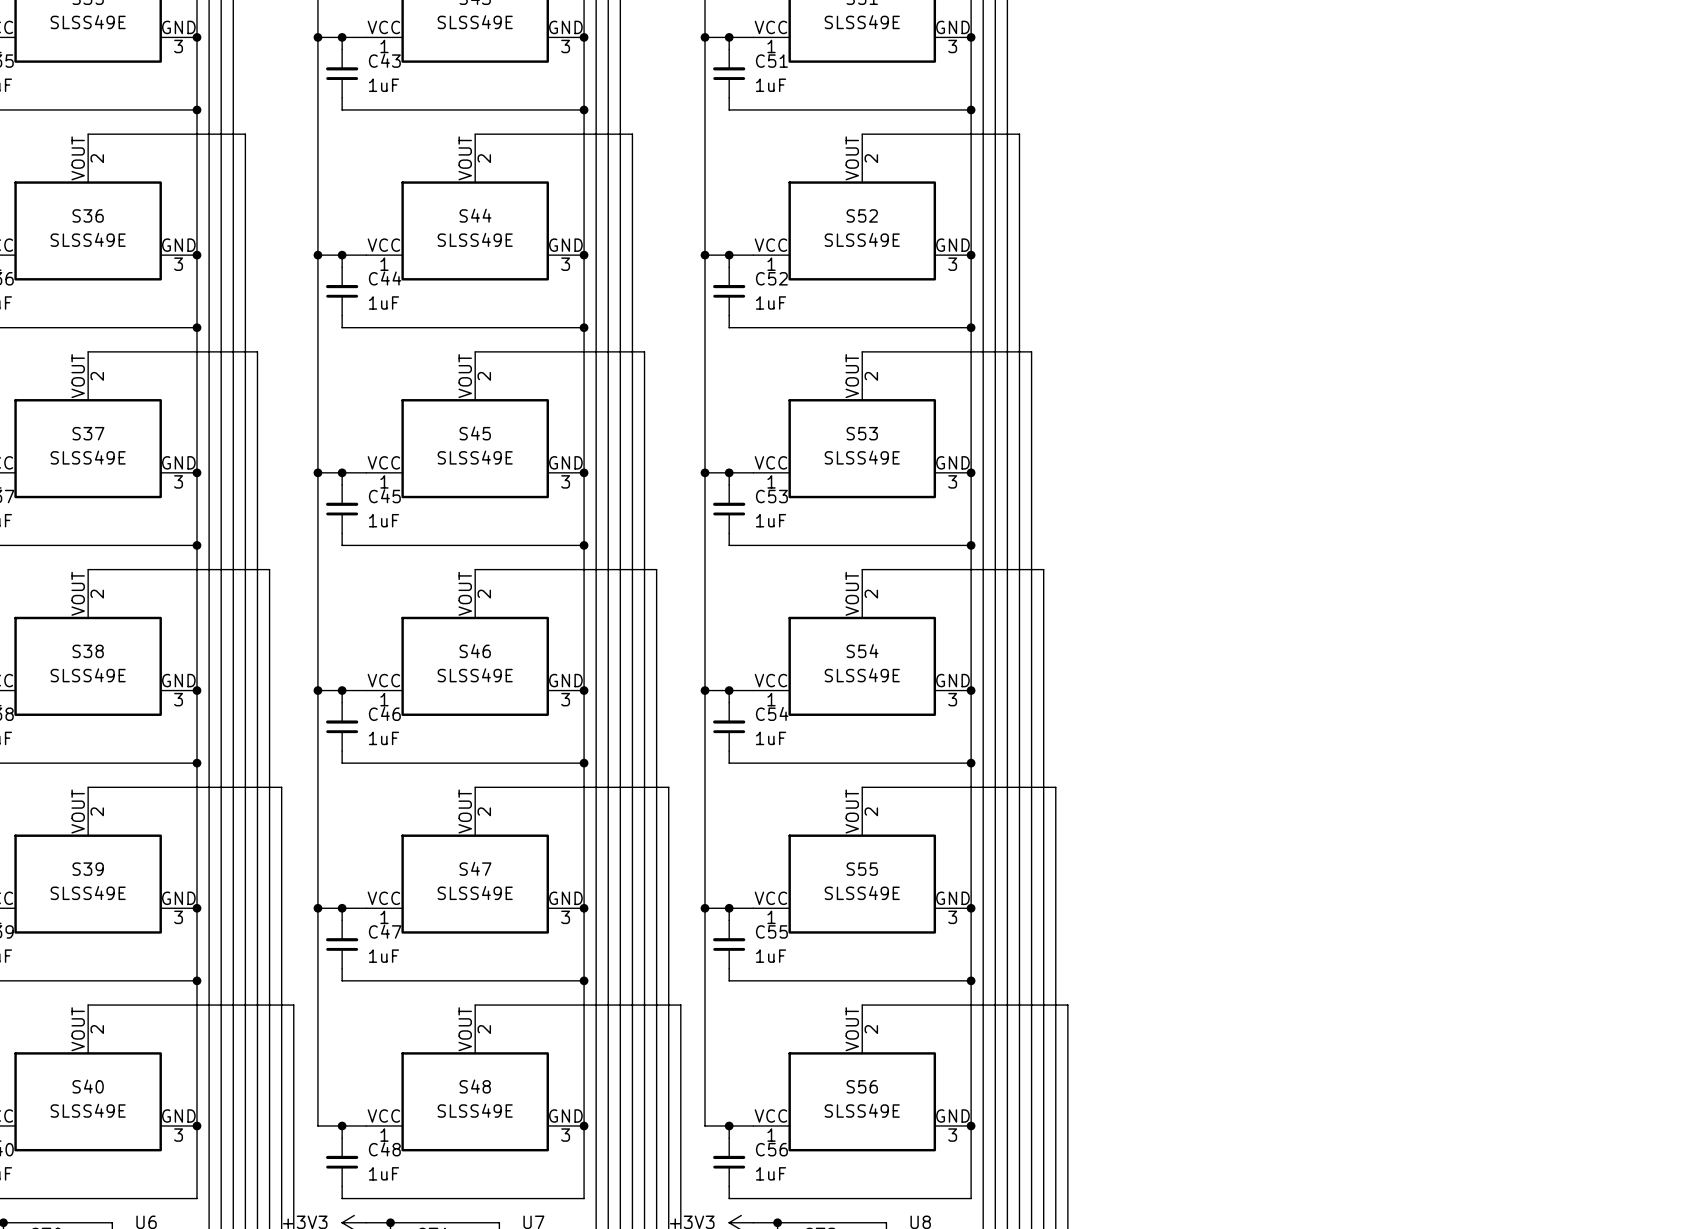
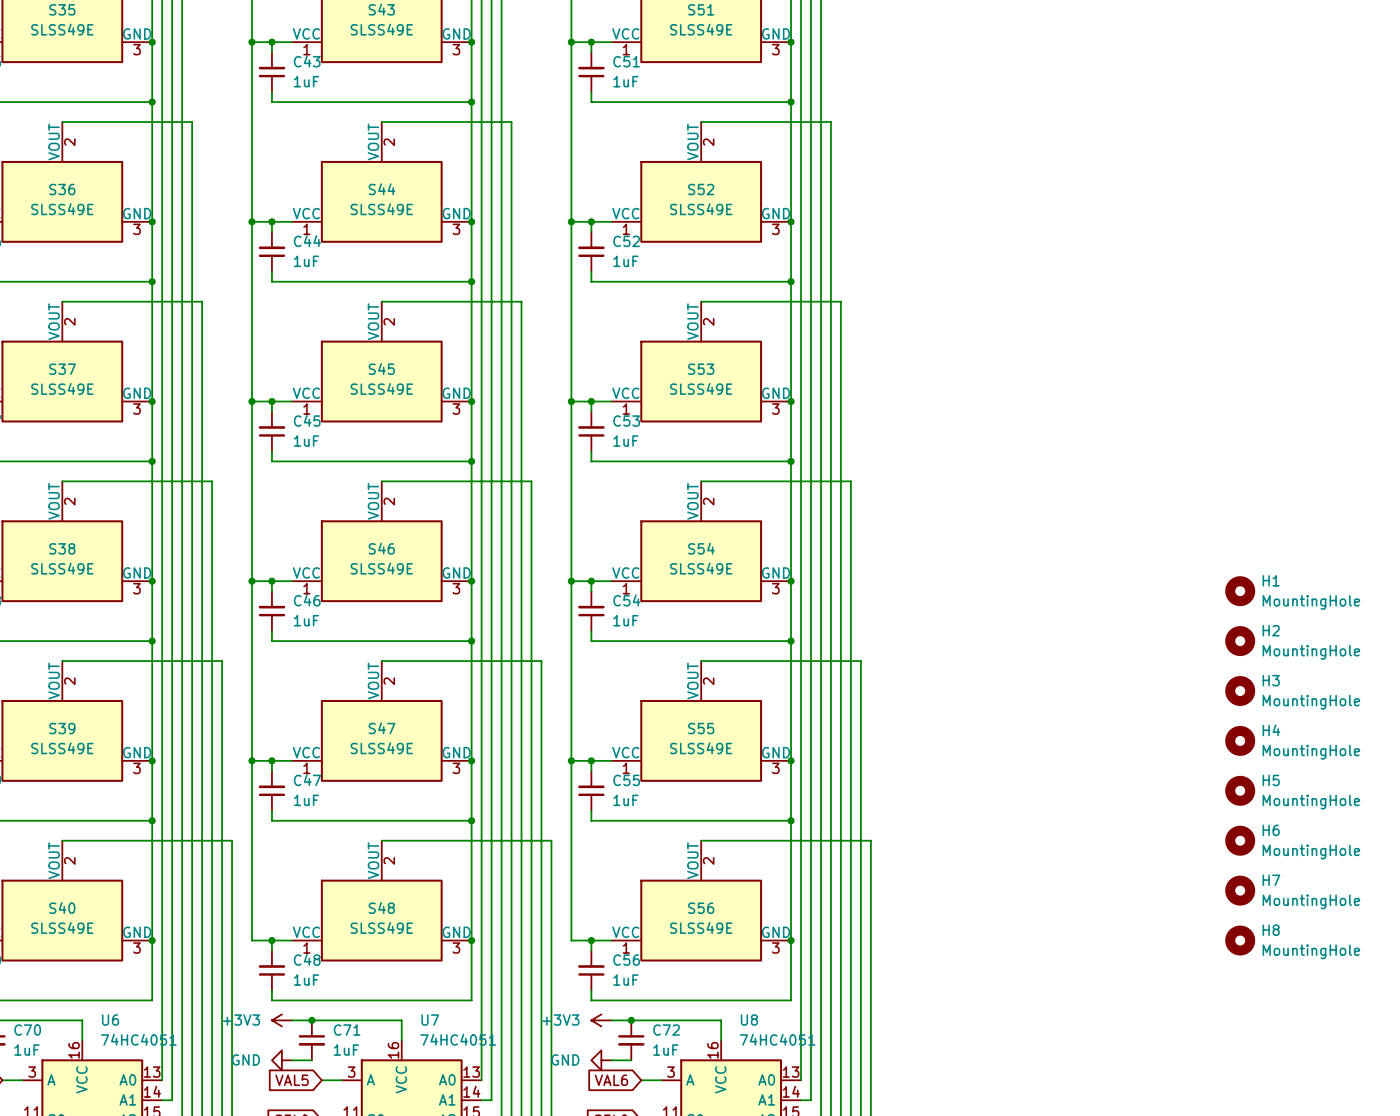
H1: none -> MountingHole (1240, 591)
H2: none -> MountingHole (1240, 641)
H3: none -> MountingHole (1240, 690)
H4: none -> MountingHole (1240, 740)
H5: none -> MountingHole (1240, 790)
H6: none -> MountingHole (1240, 840)
H7: none -> MountingHole (1240, 890)
H8: none -> MountingHole (1240, 940)

